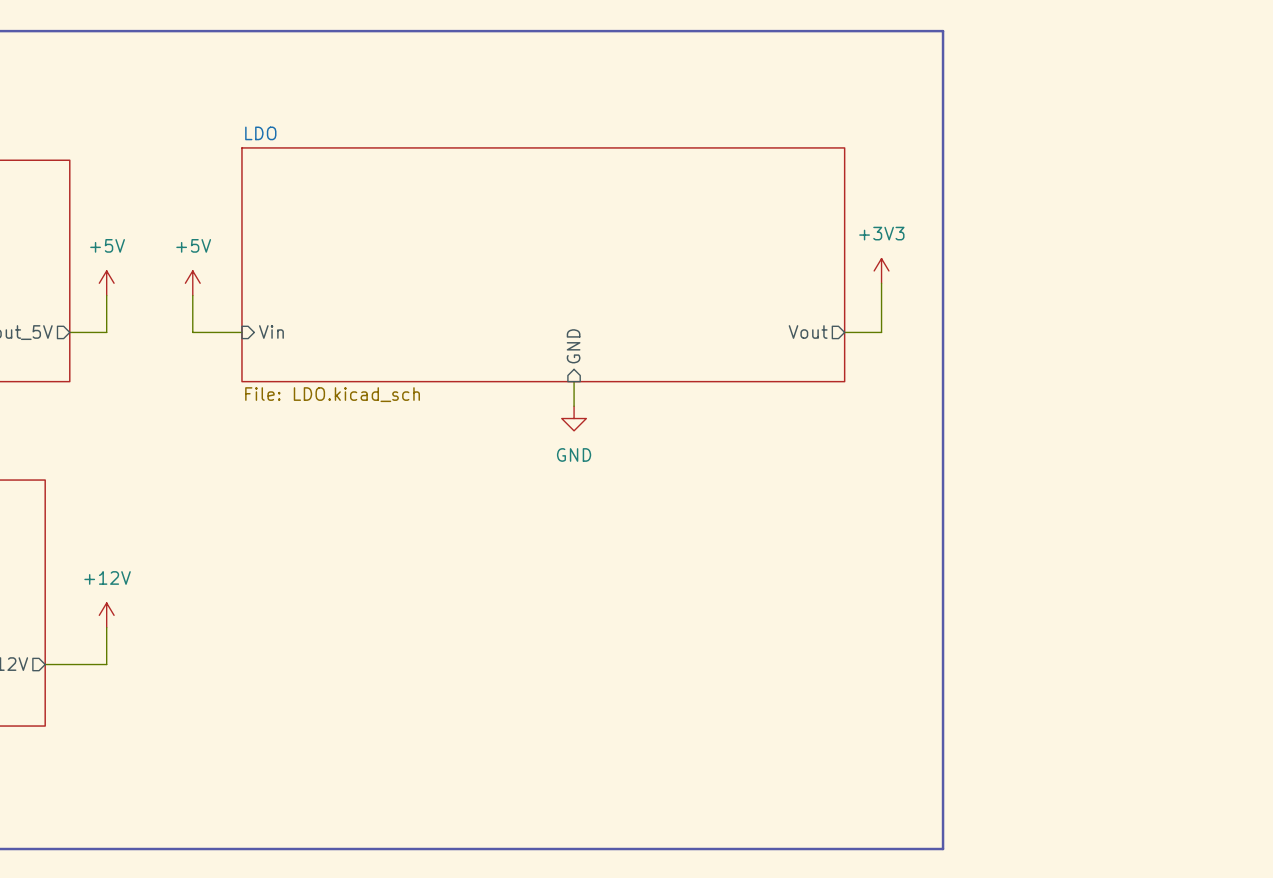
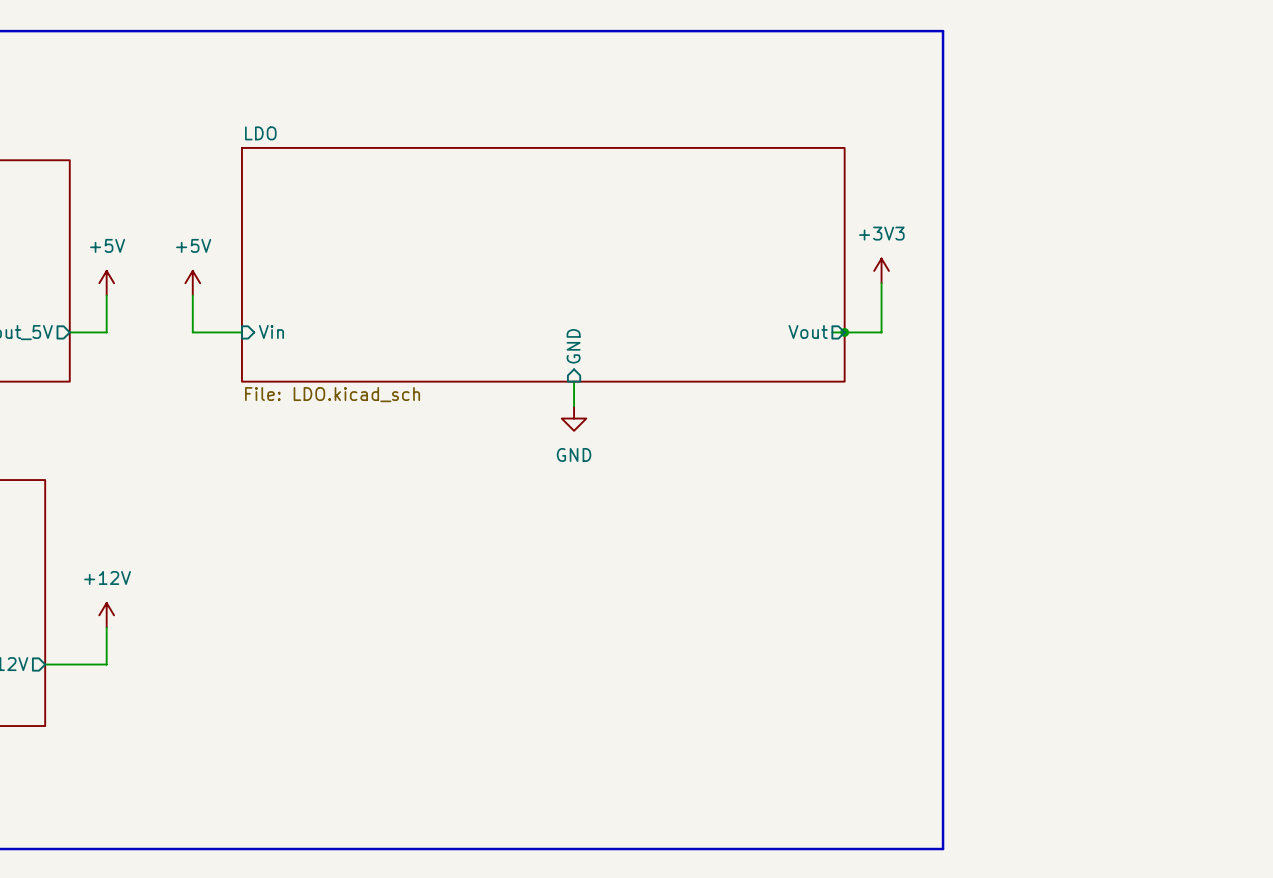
wire: none -> (832, 332) (844, 332)
junction: none -> (844, 332)

